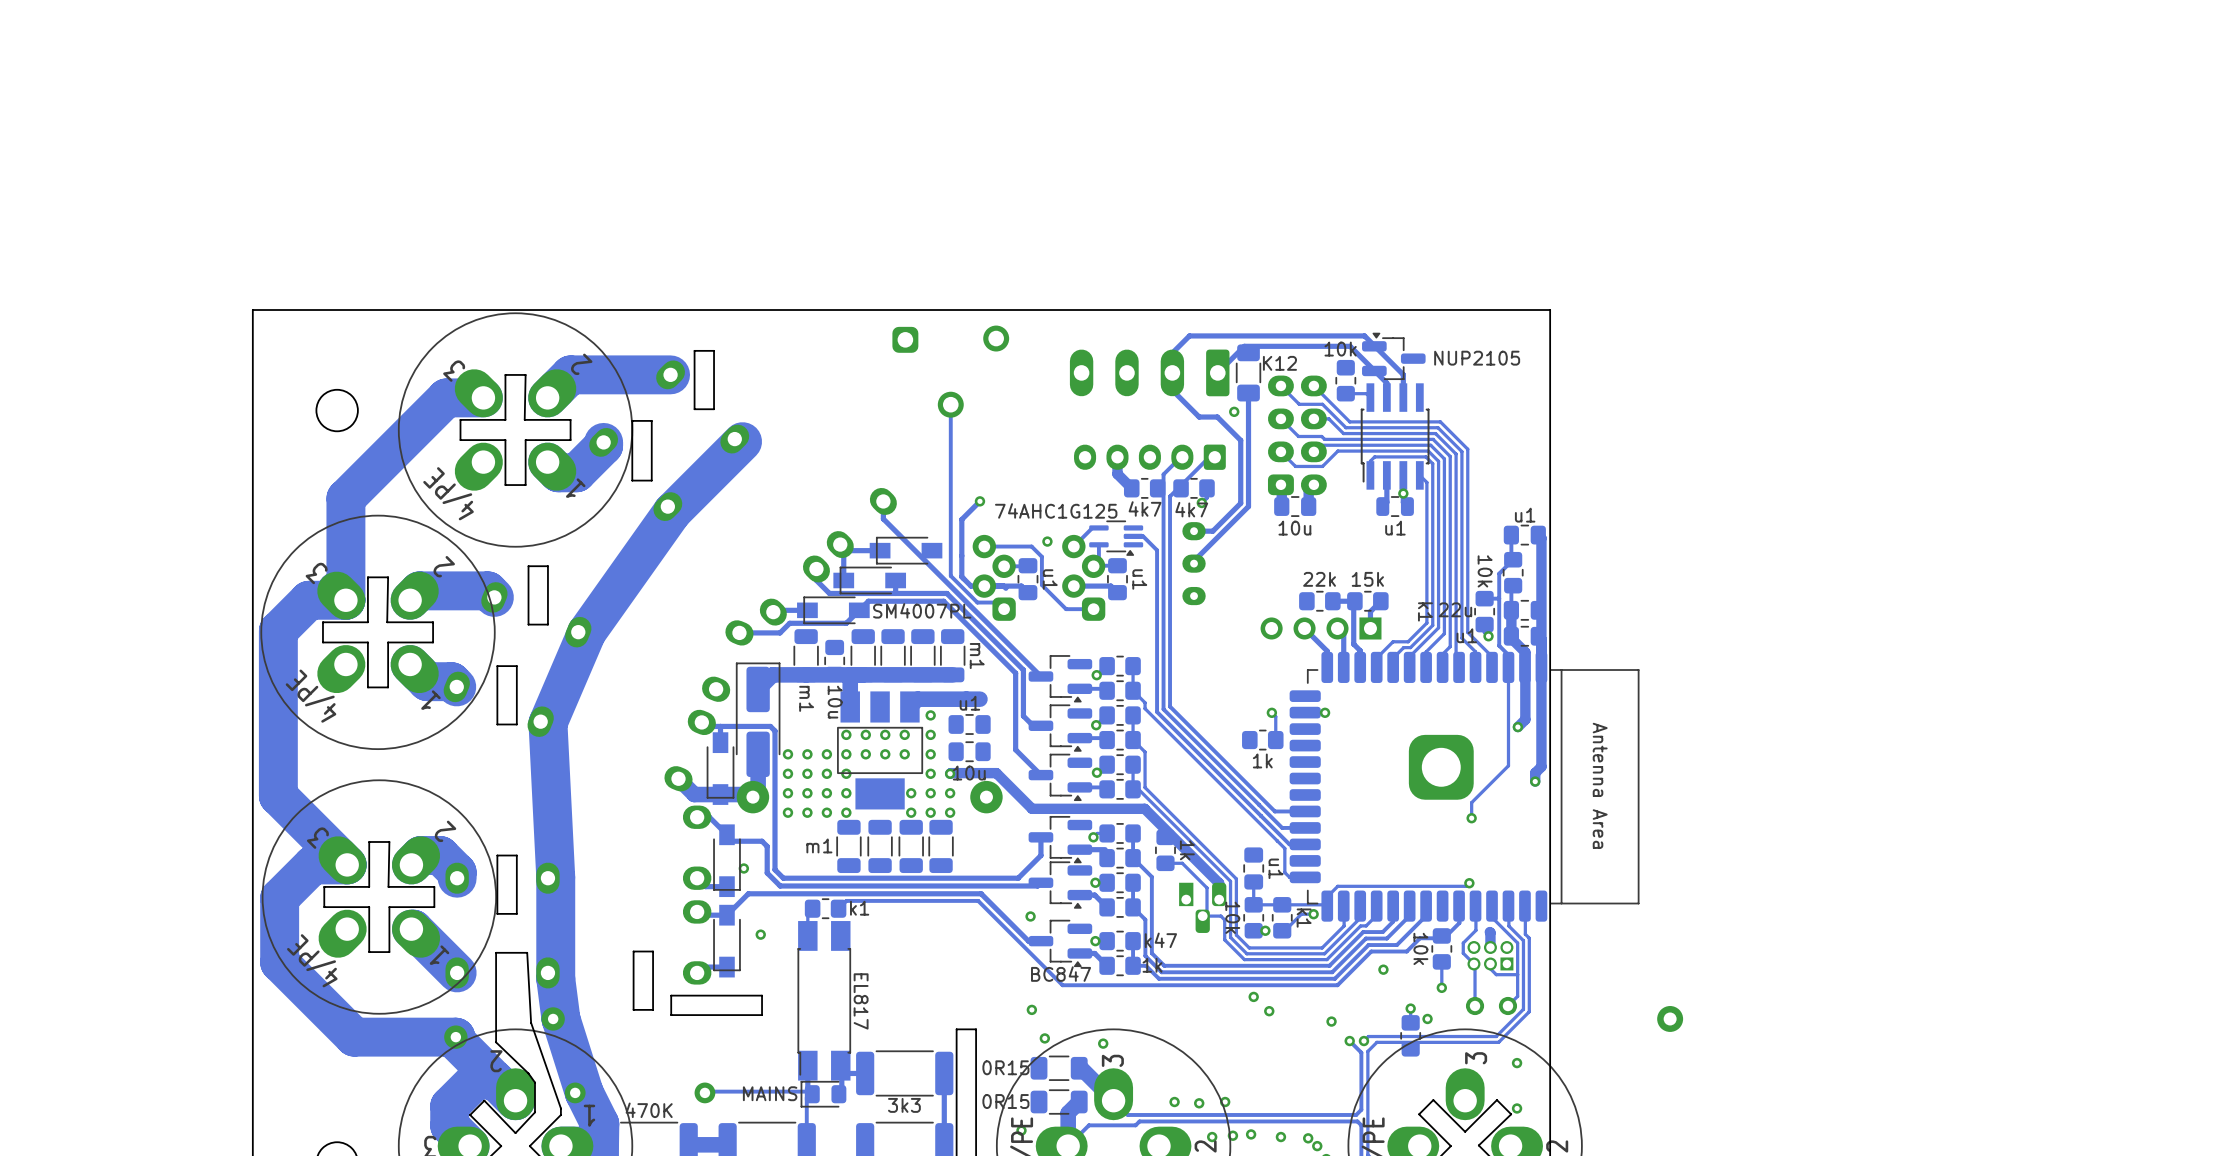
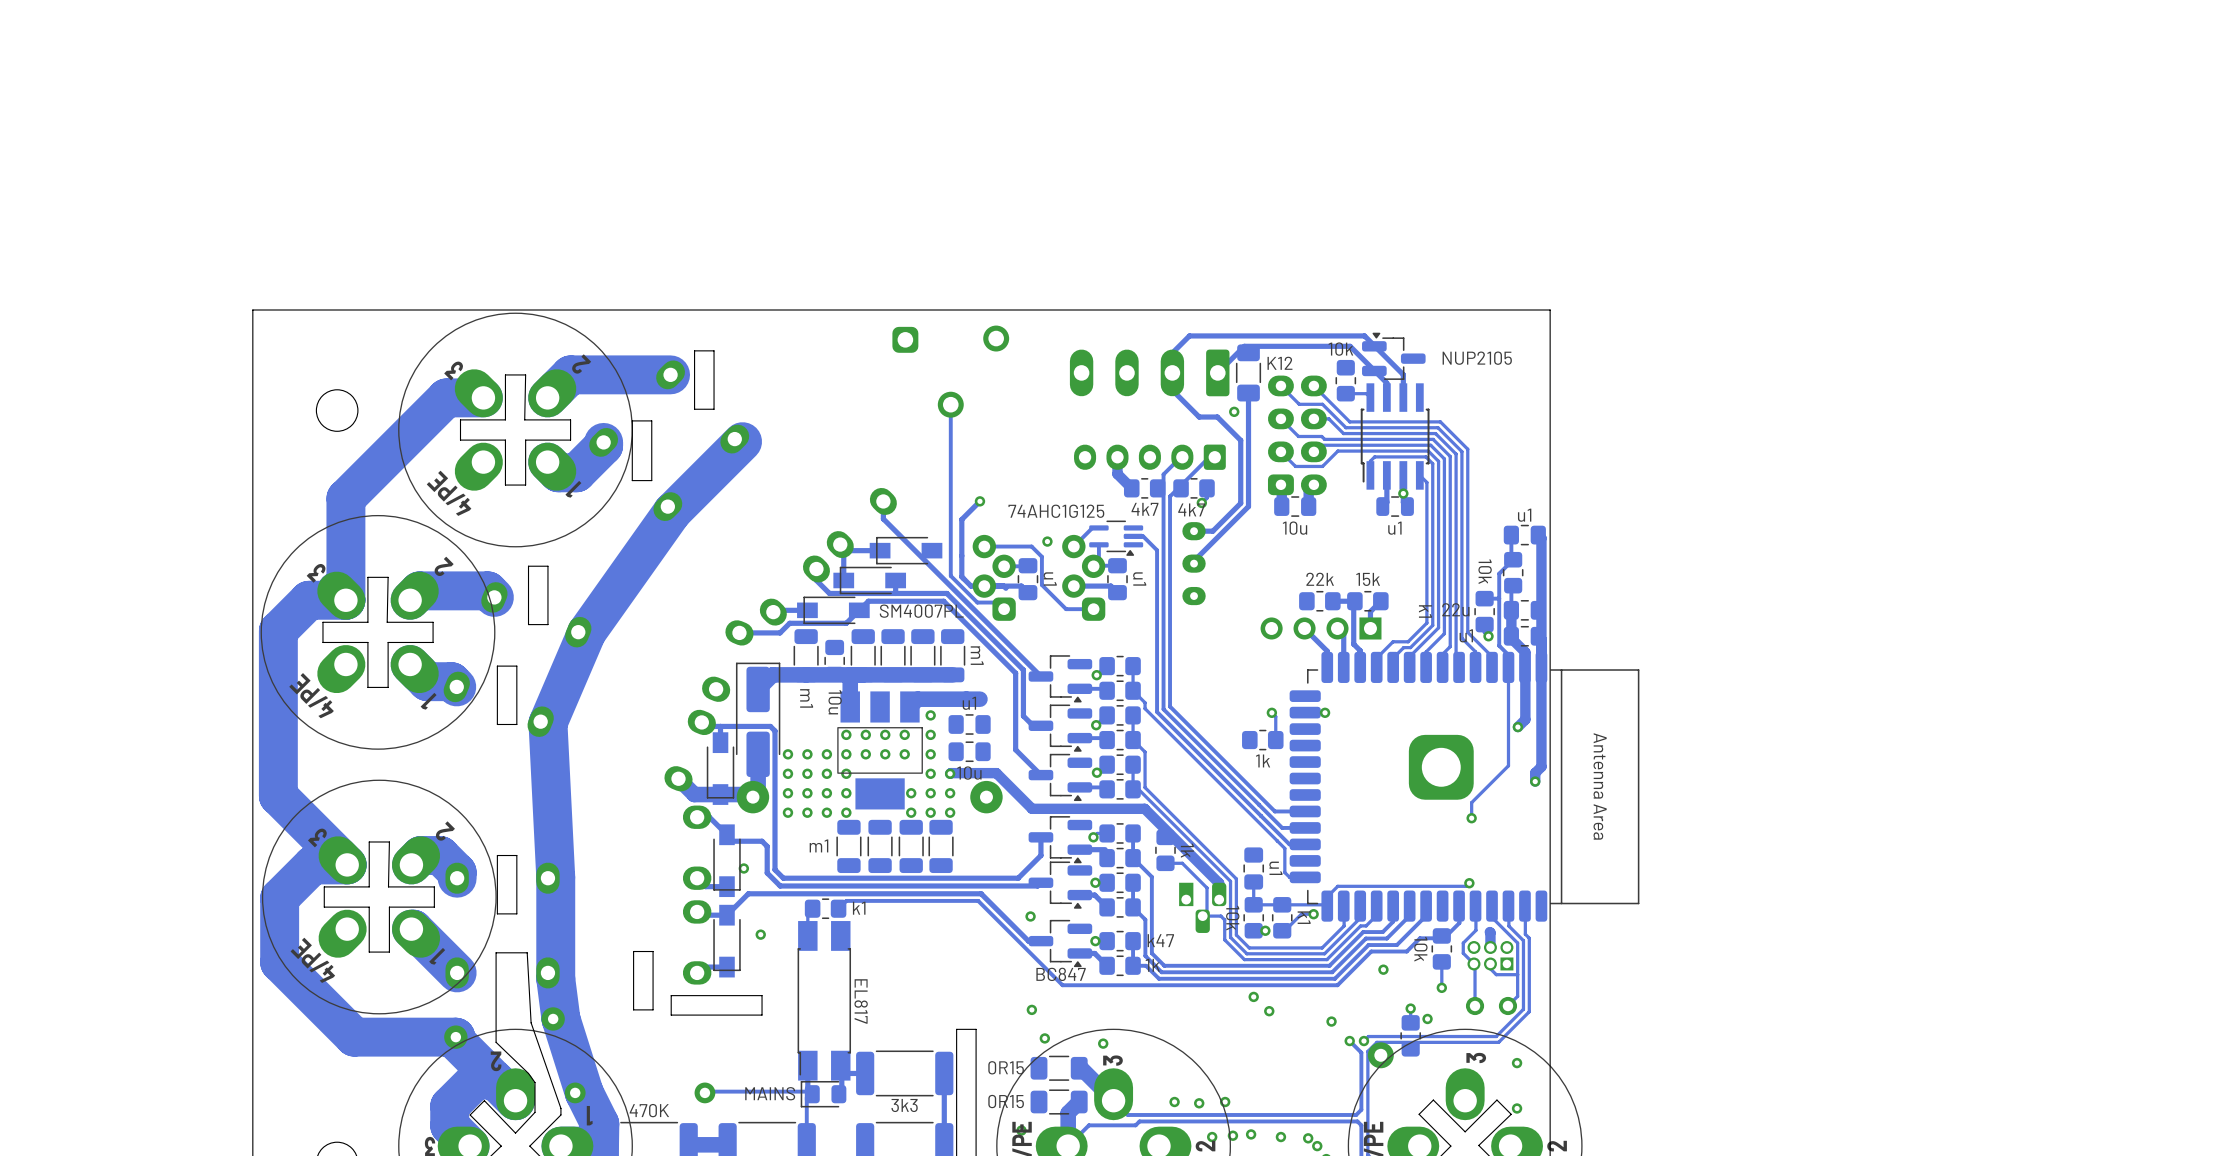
part position: (1670, 1018) -> (1380, 1055)

